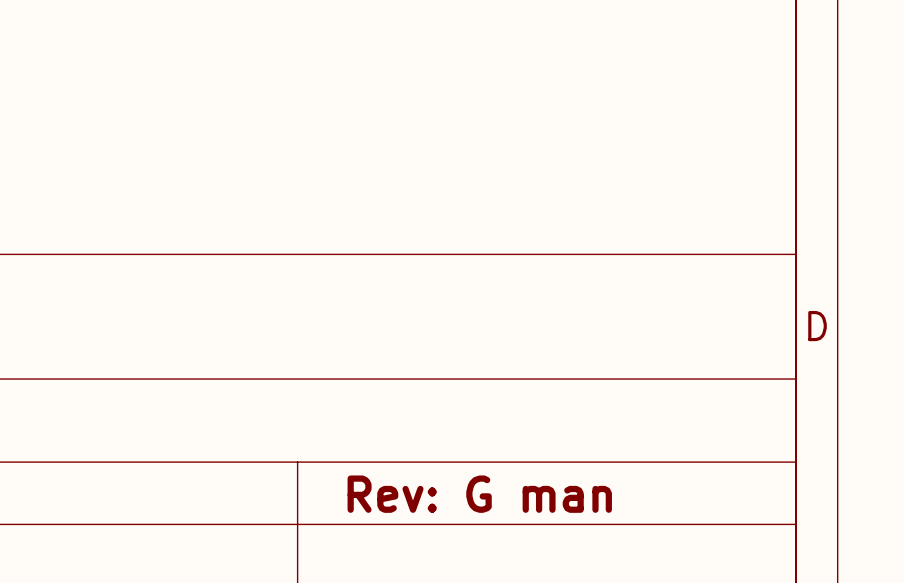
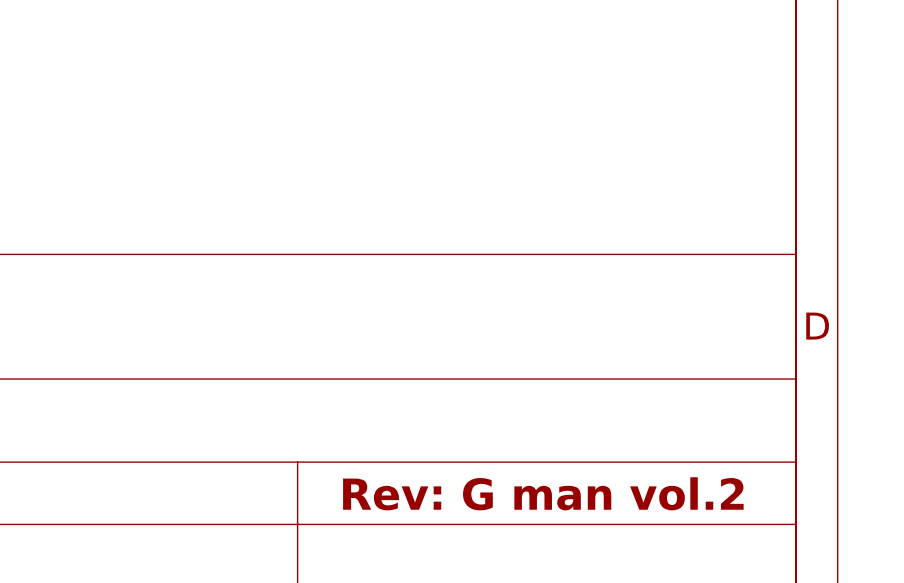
title block: Rev: G man (479, 494) -> Rev: G man vol.2 (543, 493)

